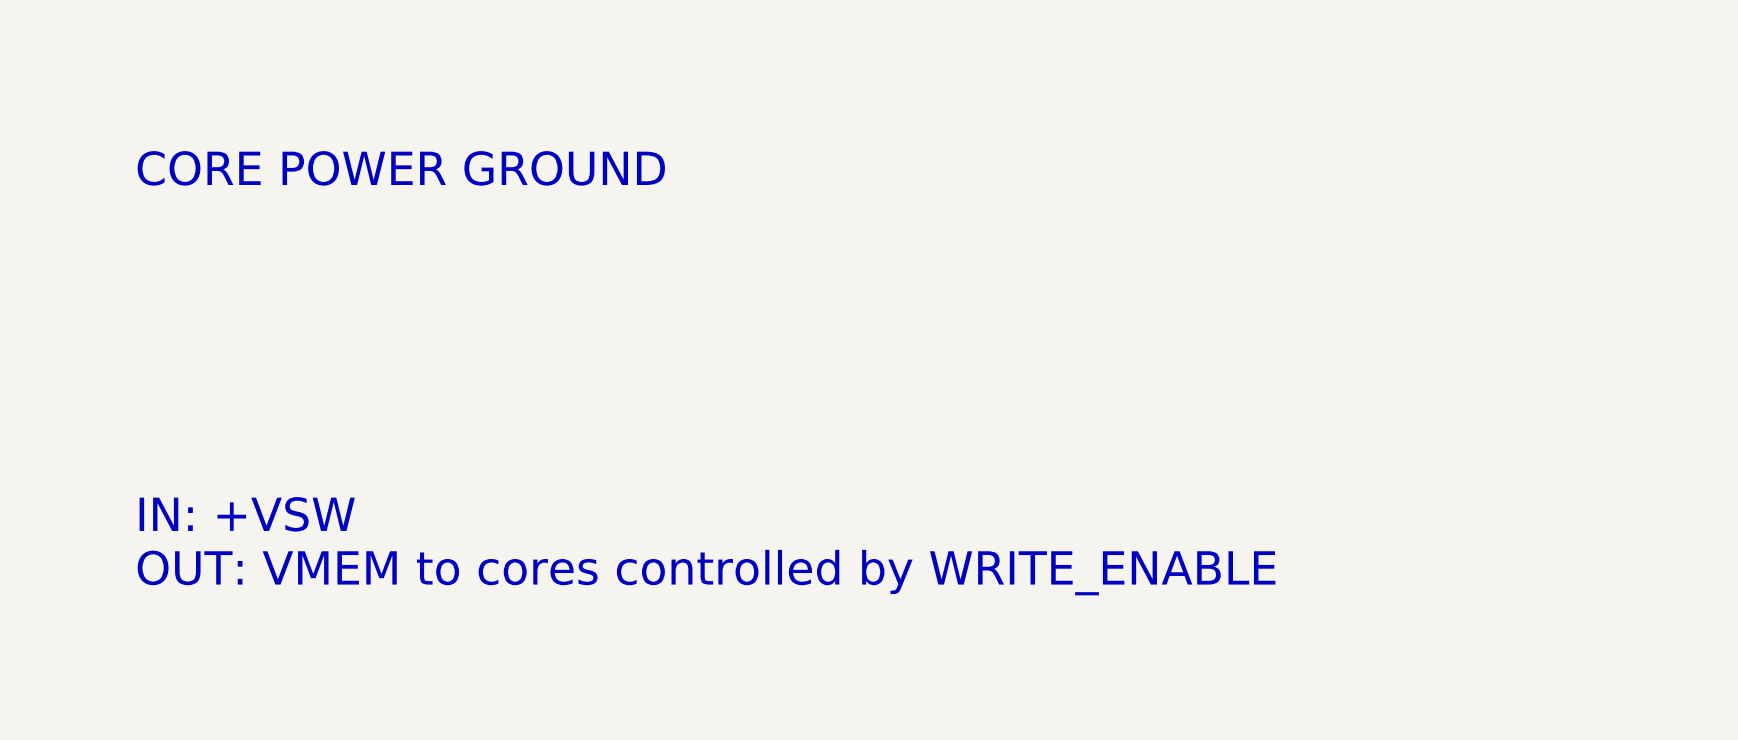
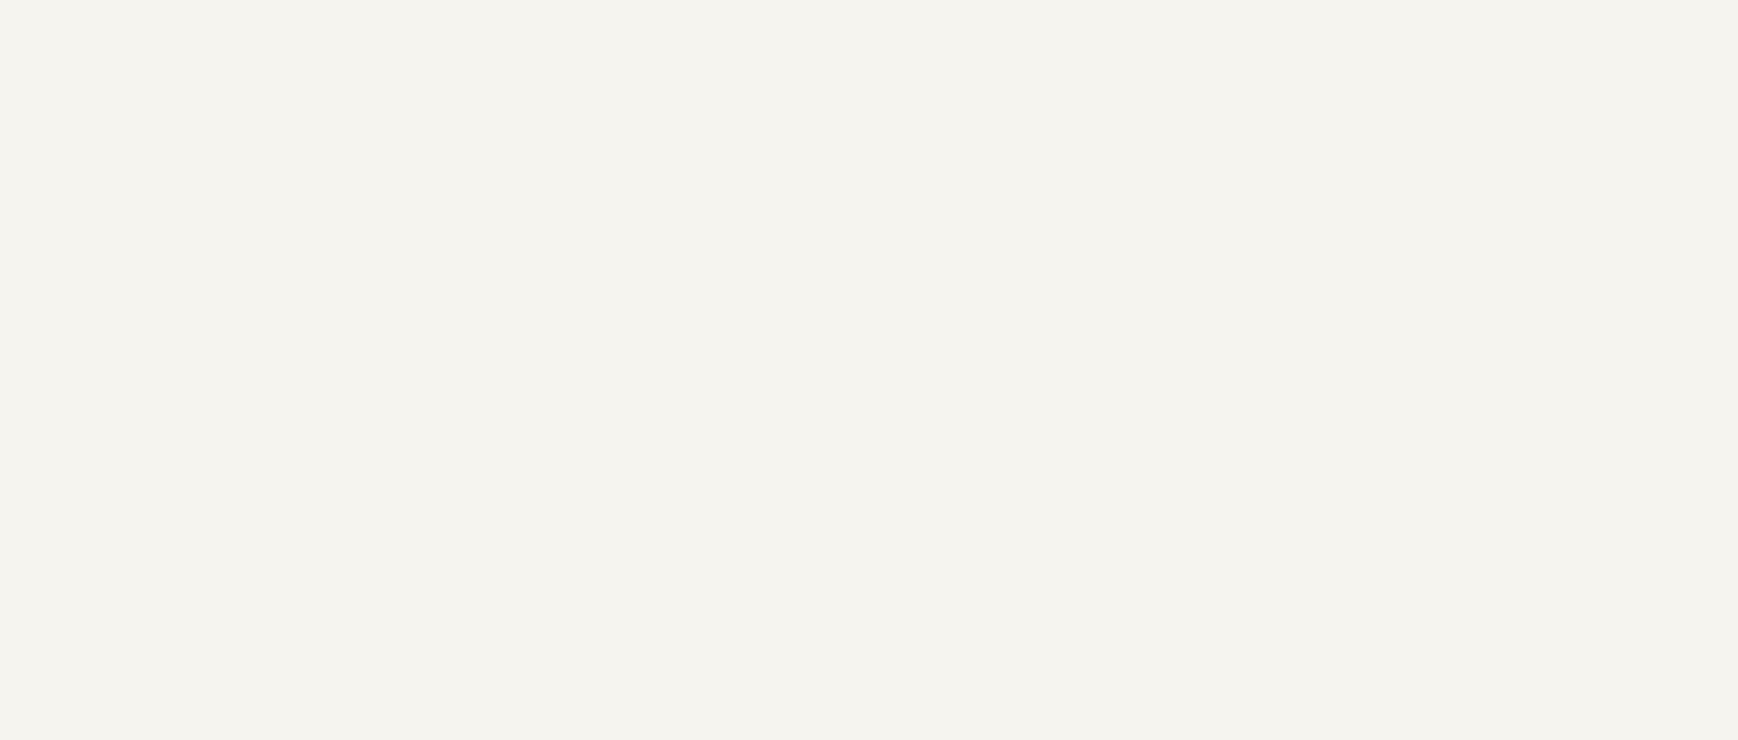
text: CORE POWER GROUND (401, 168) -> none
text: IN: +VSW (247, 514) -> none
text: OUT: VMEM to cores controlled by WRITE_ENABLE (706, 572) -> none

